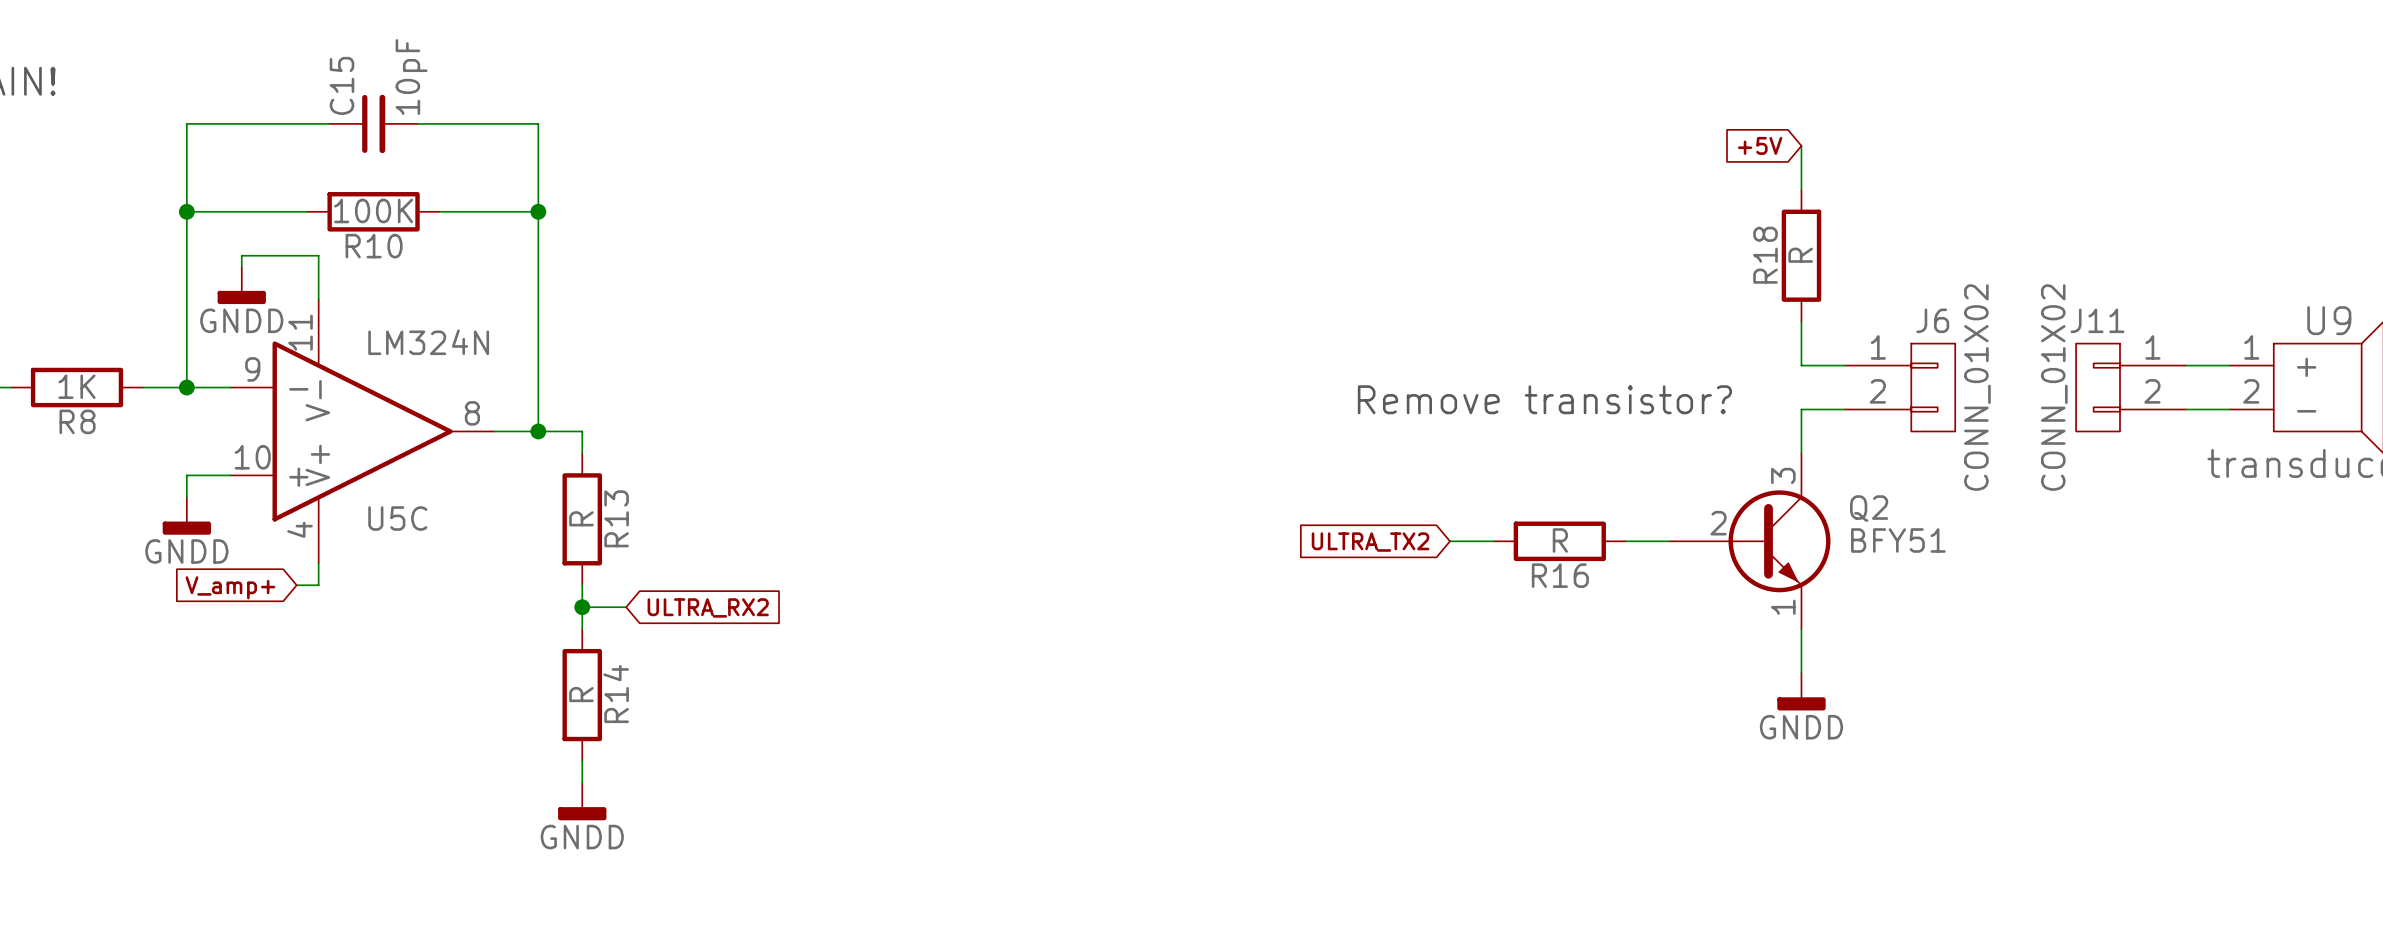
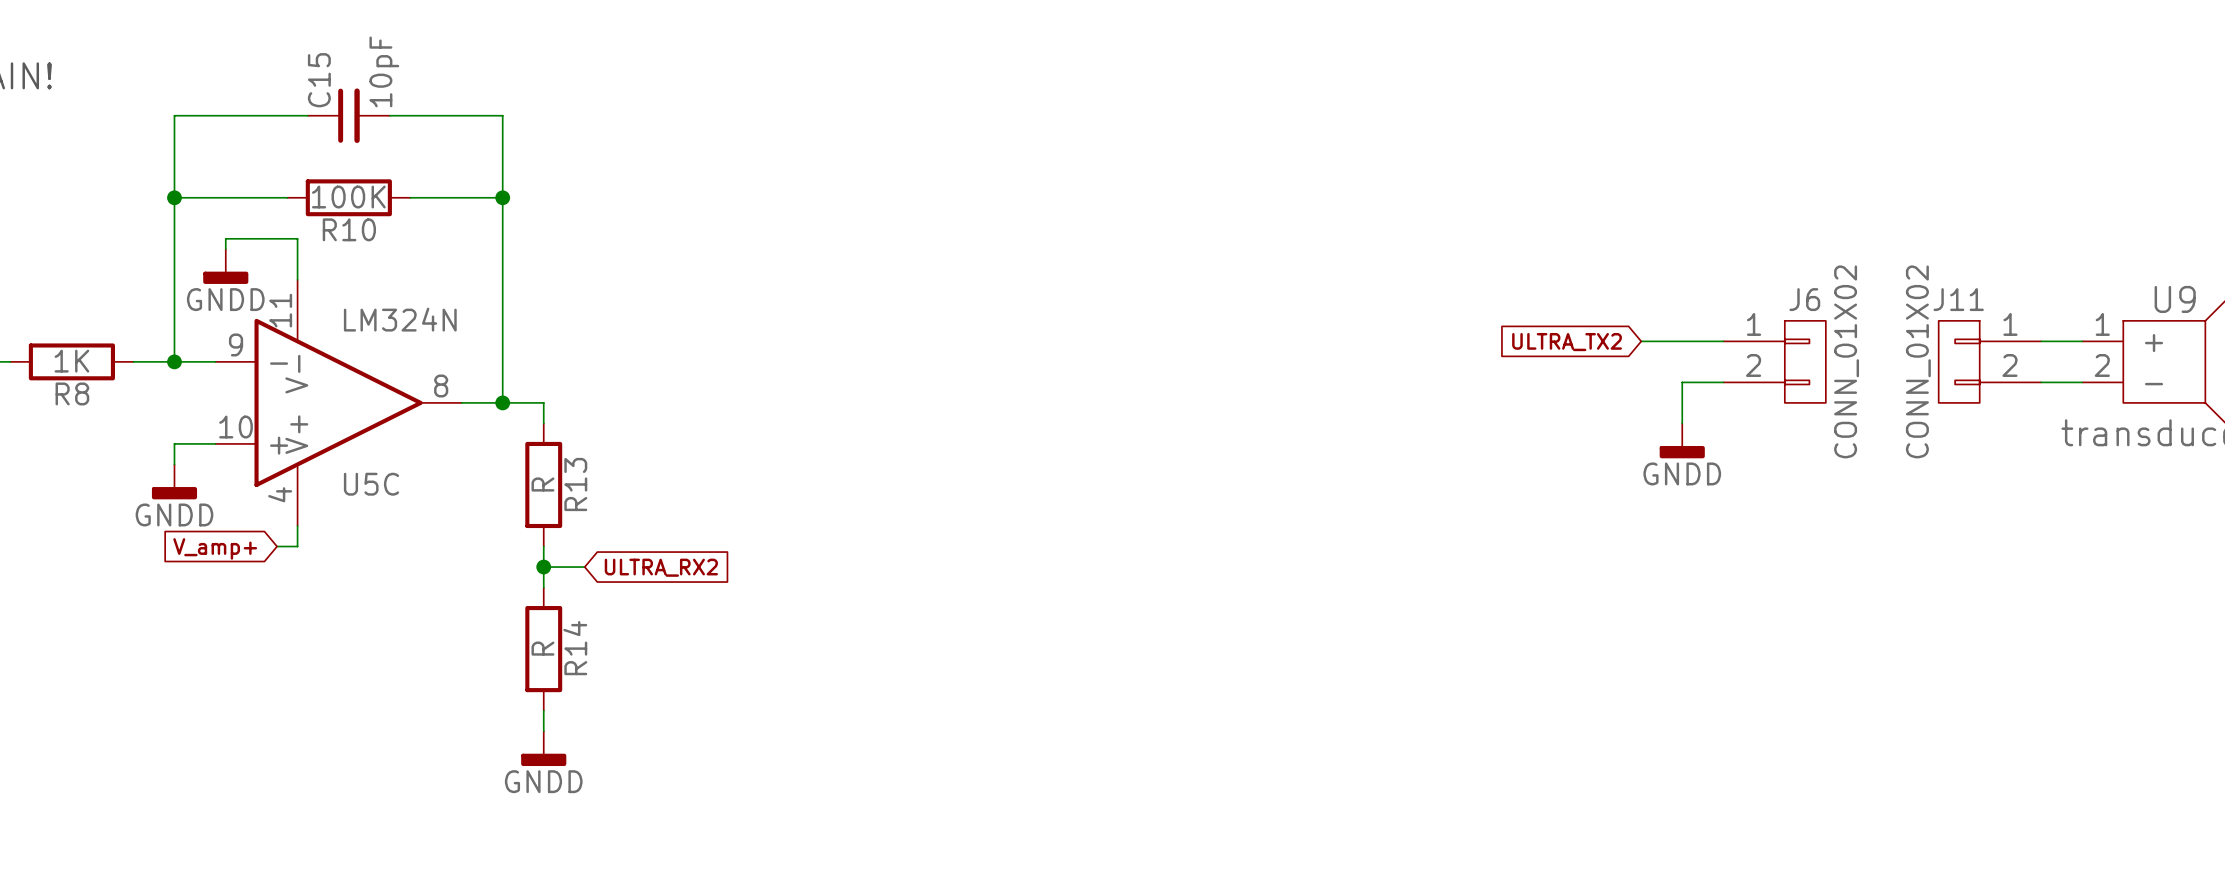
global label: +5V (1760, 145) -> none
wire: (1801, 145) (1801, 189) -> none
R18: R (1801, 255) -> none
wire: (1801, 321) (1801, 365) -> (1641, 341) (1682, 341)
text: Remove transistor? (1544, 399) -> none
wire: (1449, 541) (1493, 541) -> none
R16: R (1559, 541) -> none
wire: (1625, 541) (1669, 541) -> none
Q2: BFY51 (1750, 541) -> none
global label position: ULTRA_TX2 (1370, 542) -> ULTRA_TX2 (1567, 342)
wire: (1801, 629) (1801, 673) -> none
power symbol position: GNDD (1801, 691) -> GNDD (1682, 440)

